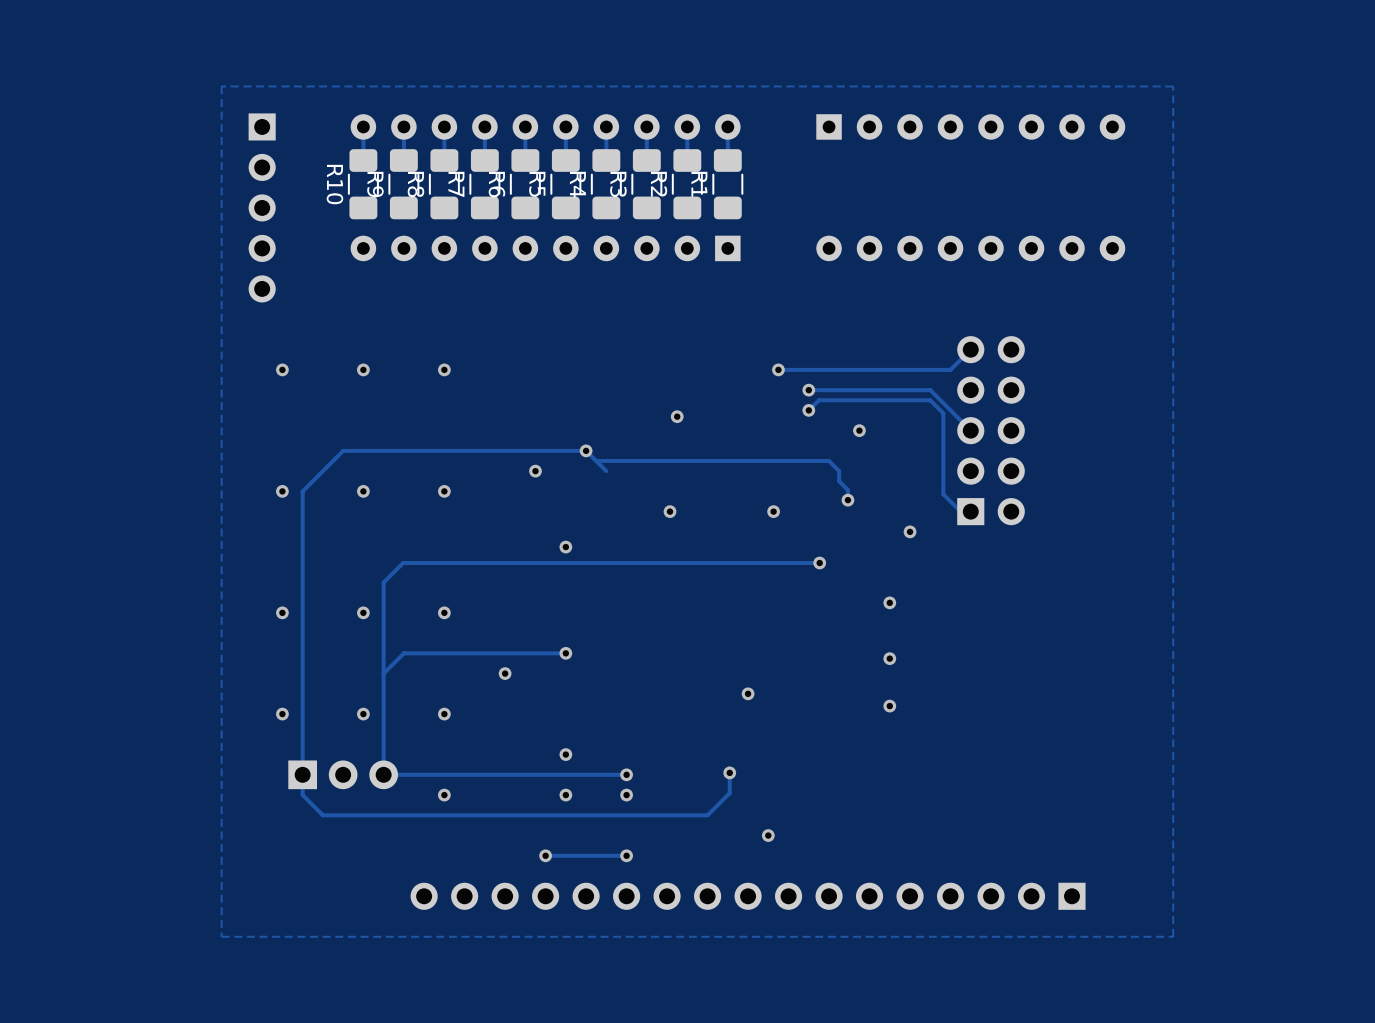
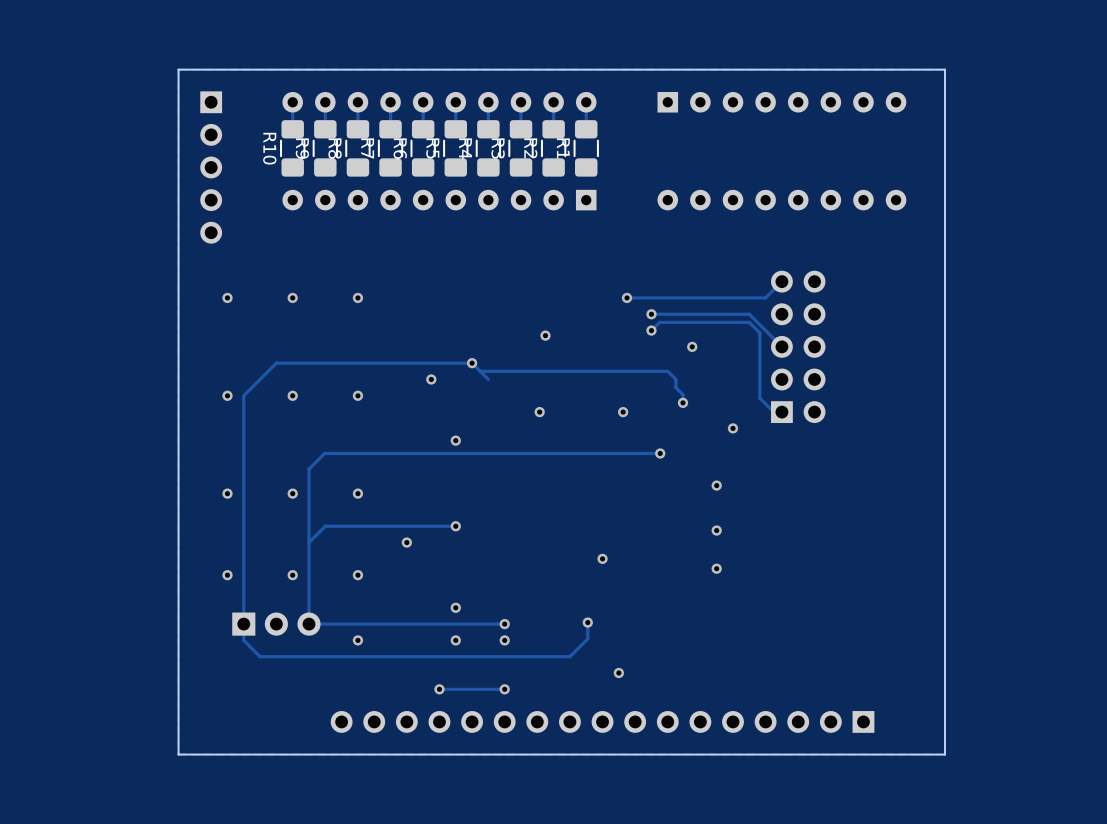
board edge: none -> (945, 69) (945, 754) (178, 754) (178, 69) (945, 69)

